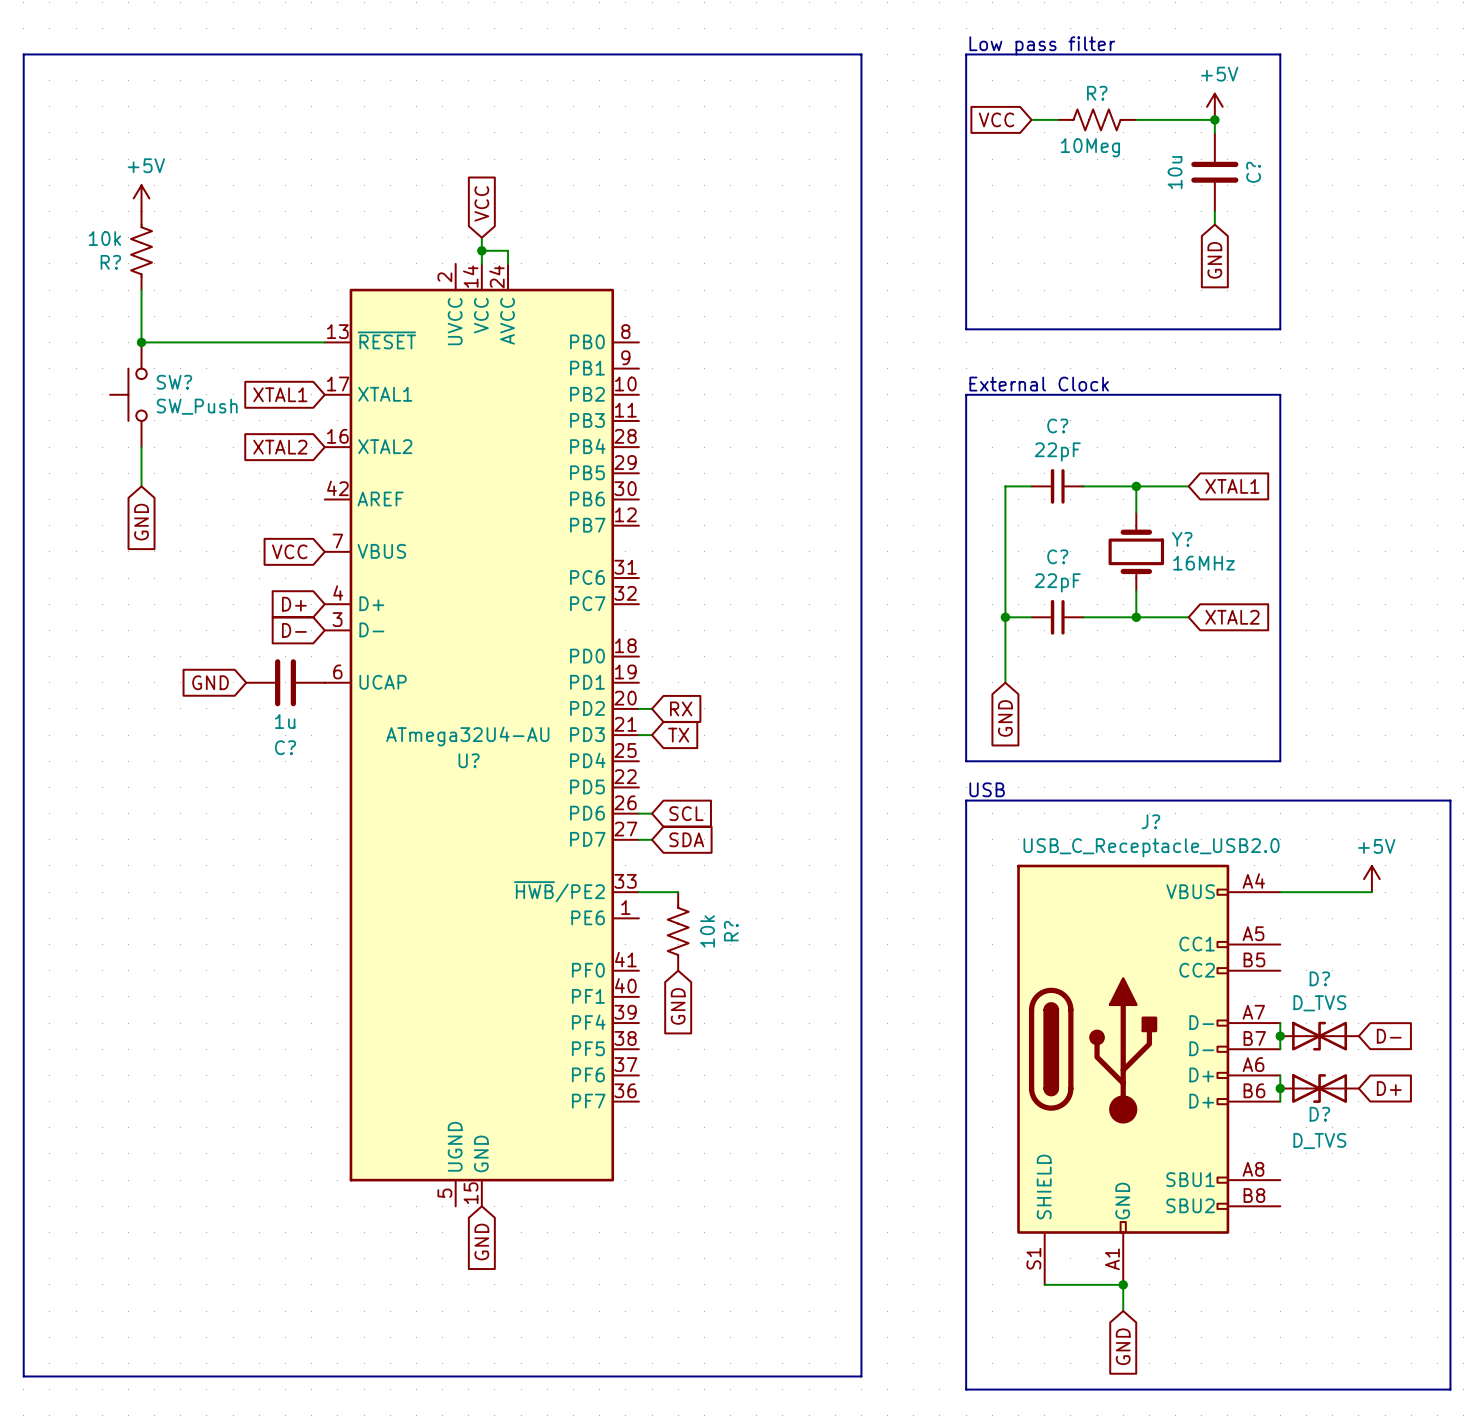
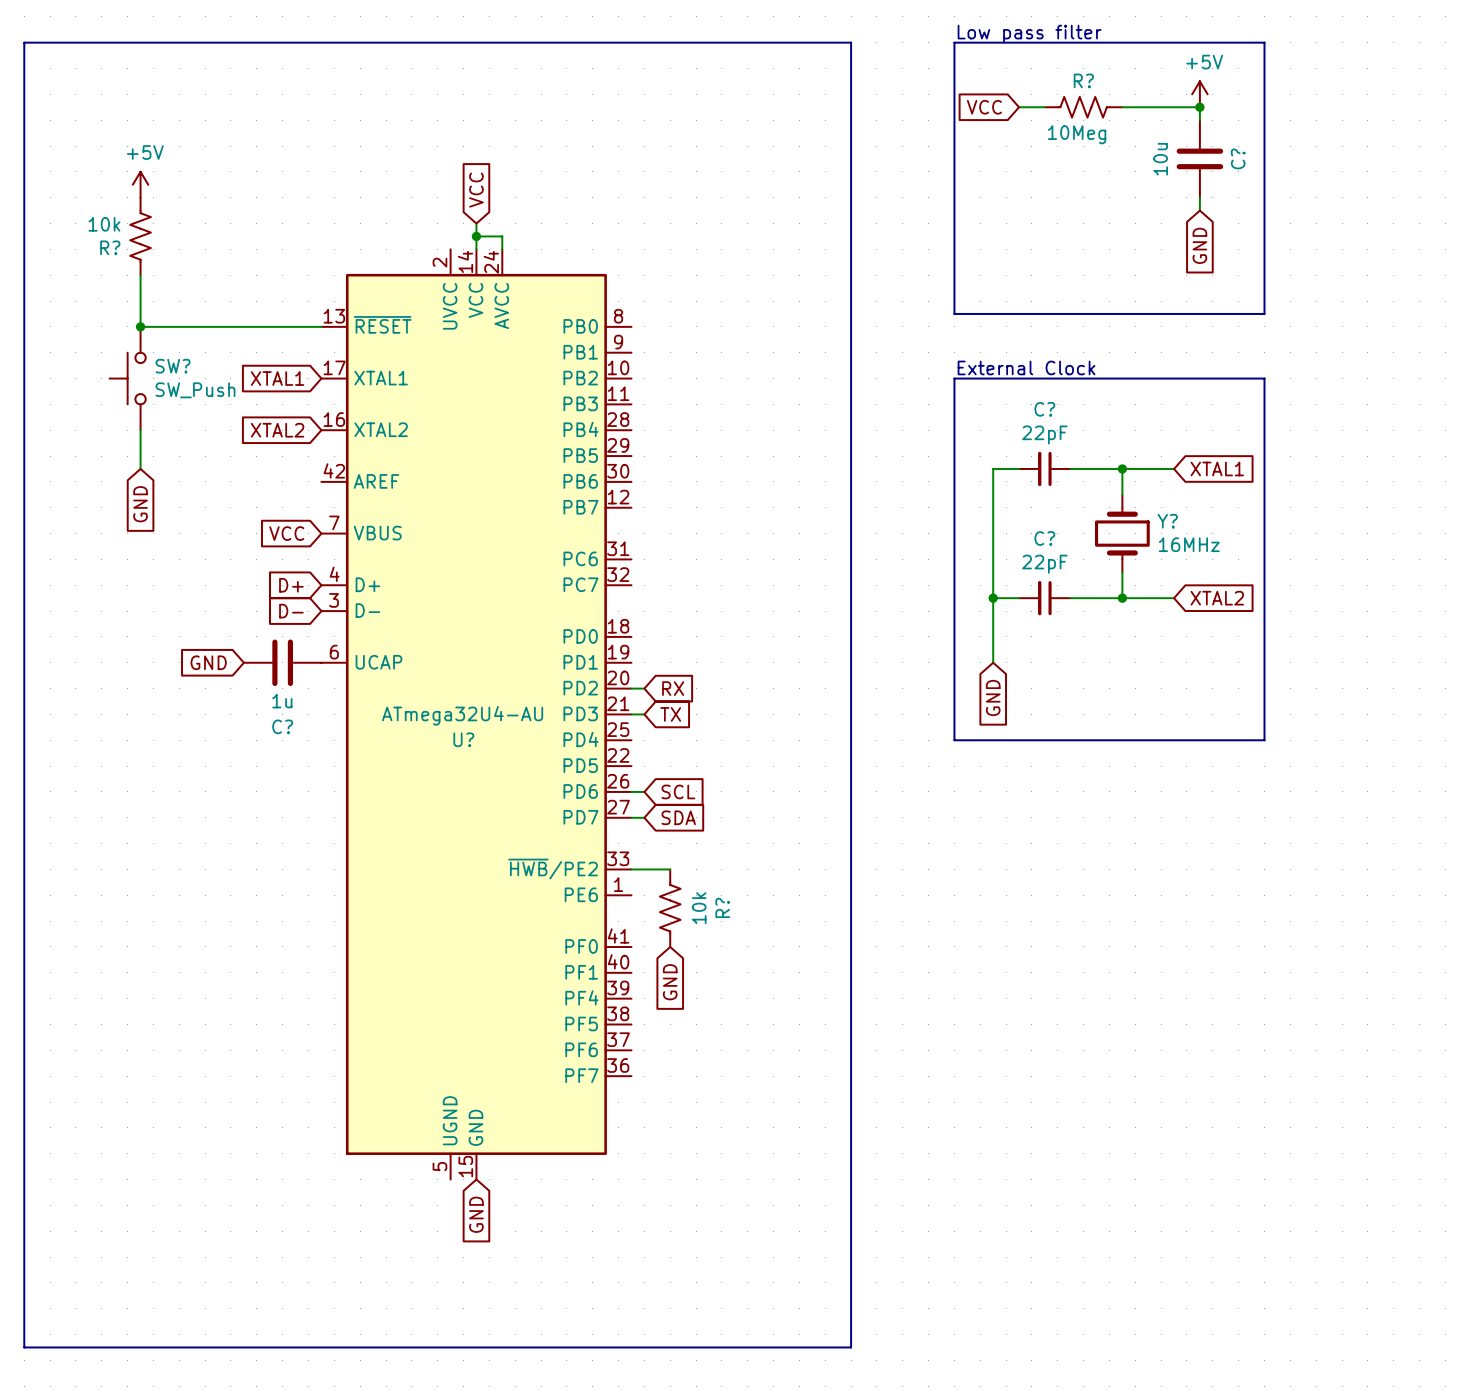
text: USB (987, 789) -> none
line: (966, 800) (966, 1389) (1450, 1389) (1450, 800) (966, 800) -> none
power symbol: +5V (1371, 879) -> none
wire: (1280, 892) (1371, 892) -> none
wire: (1280, 1023) (1280, 1049) -> none
junction: (1280, 1036) -> none
D?: D_TVS (1319, 1036) -> none
global label: D- (1389, 1036) -> none
J?: USB_C_Receptacle_USB2.0 (1148, 1074) -> none
wire: (1280, 1075) (1280, 1101) -> none
junction: (1280, 1088) -> none
D?: D_TVS (1319, 1088) -> none
global label: D+ (1389, 1088) -> none
wire: (1044, 1284) (1123, 1284) (1123, 1311) -> none
junction: (1123, 1284) -> none
global label: GND (1123, 1346) -> none

